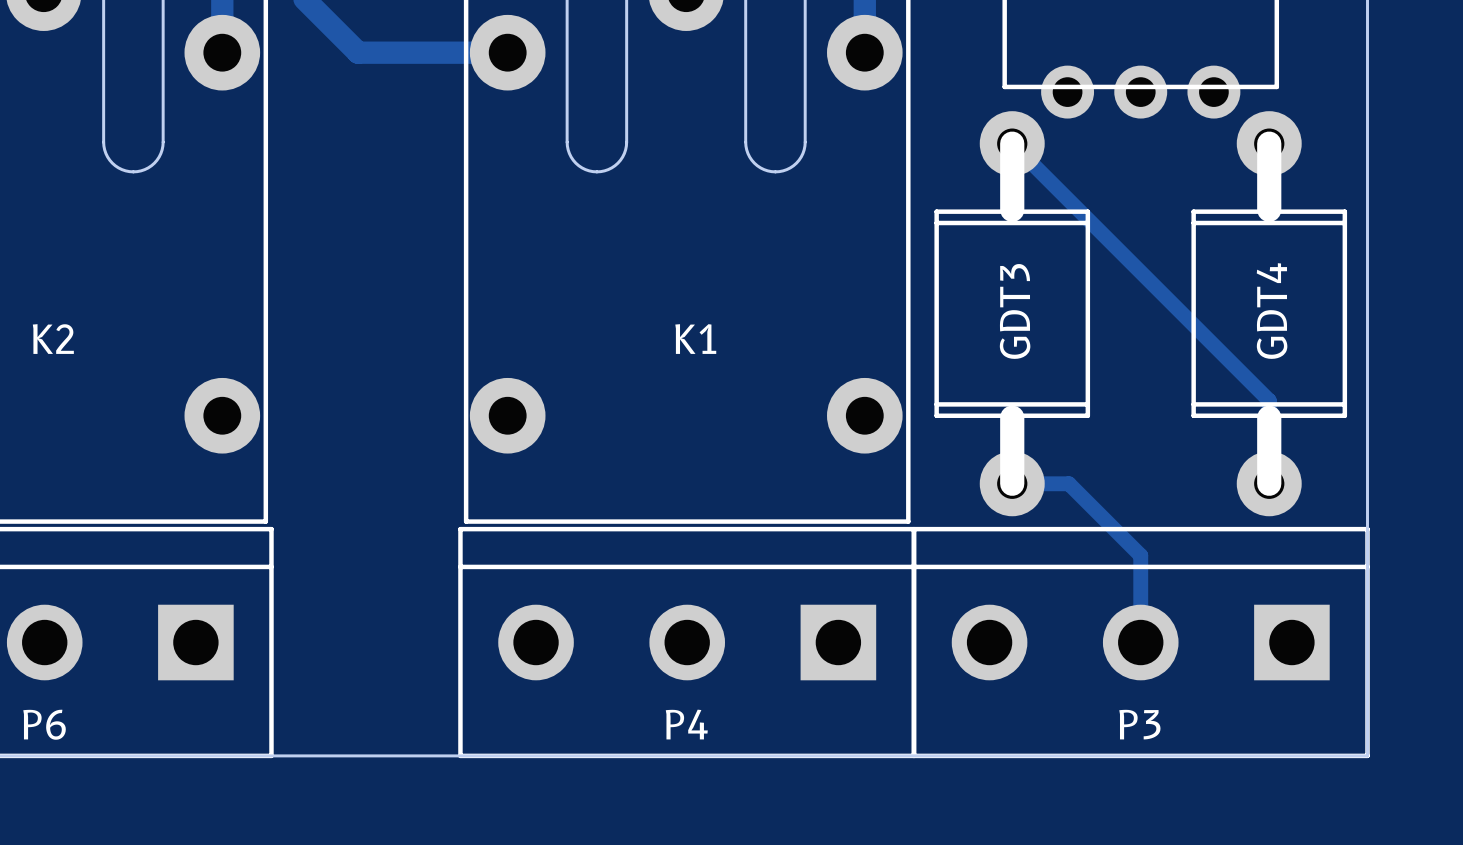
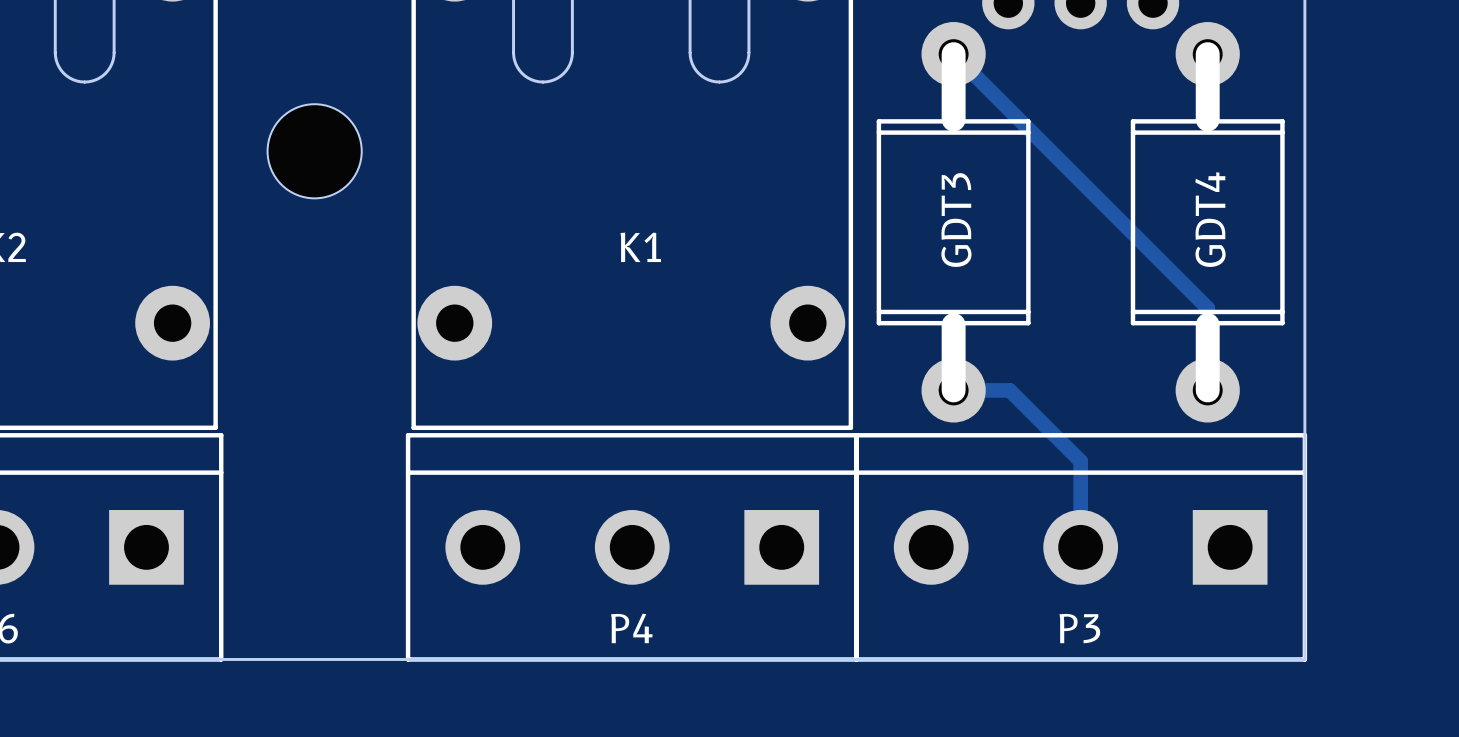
part: none -> (314, 151)

